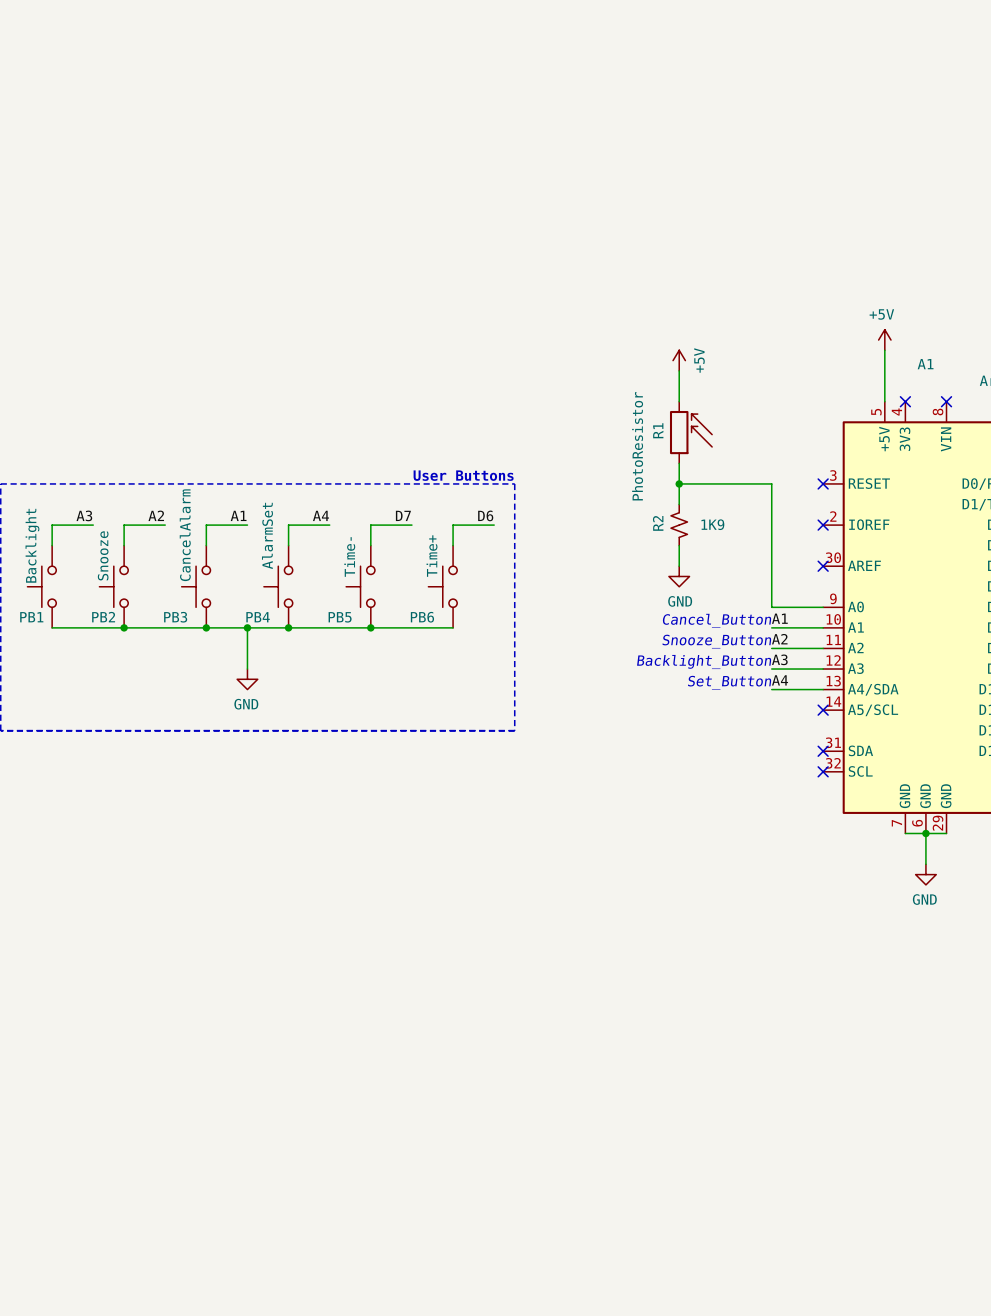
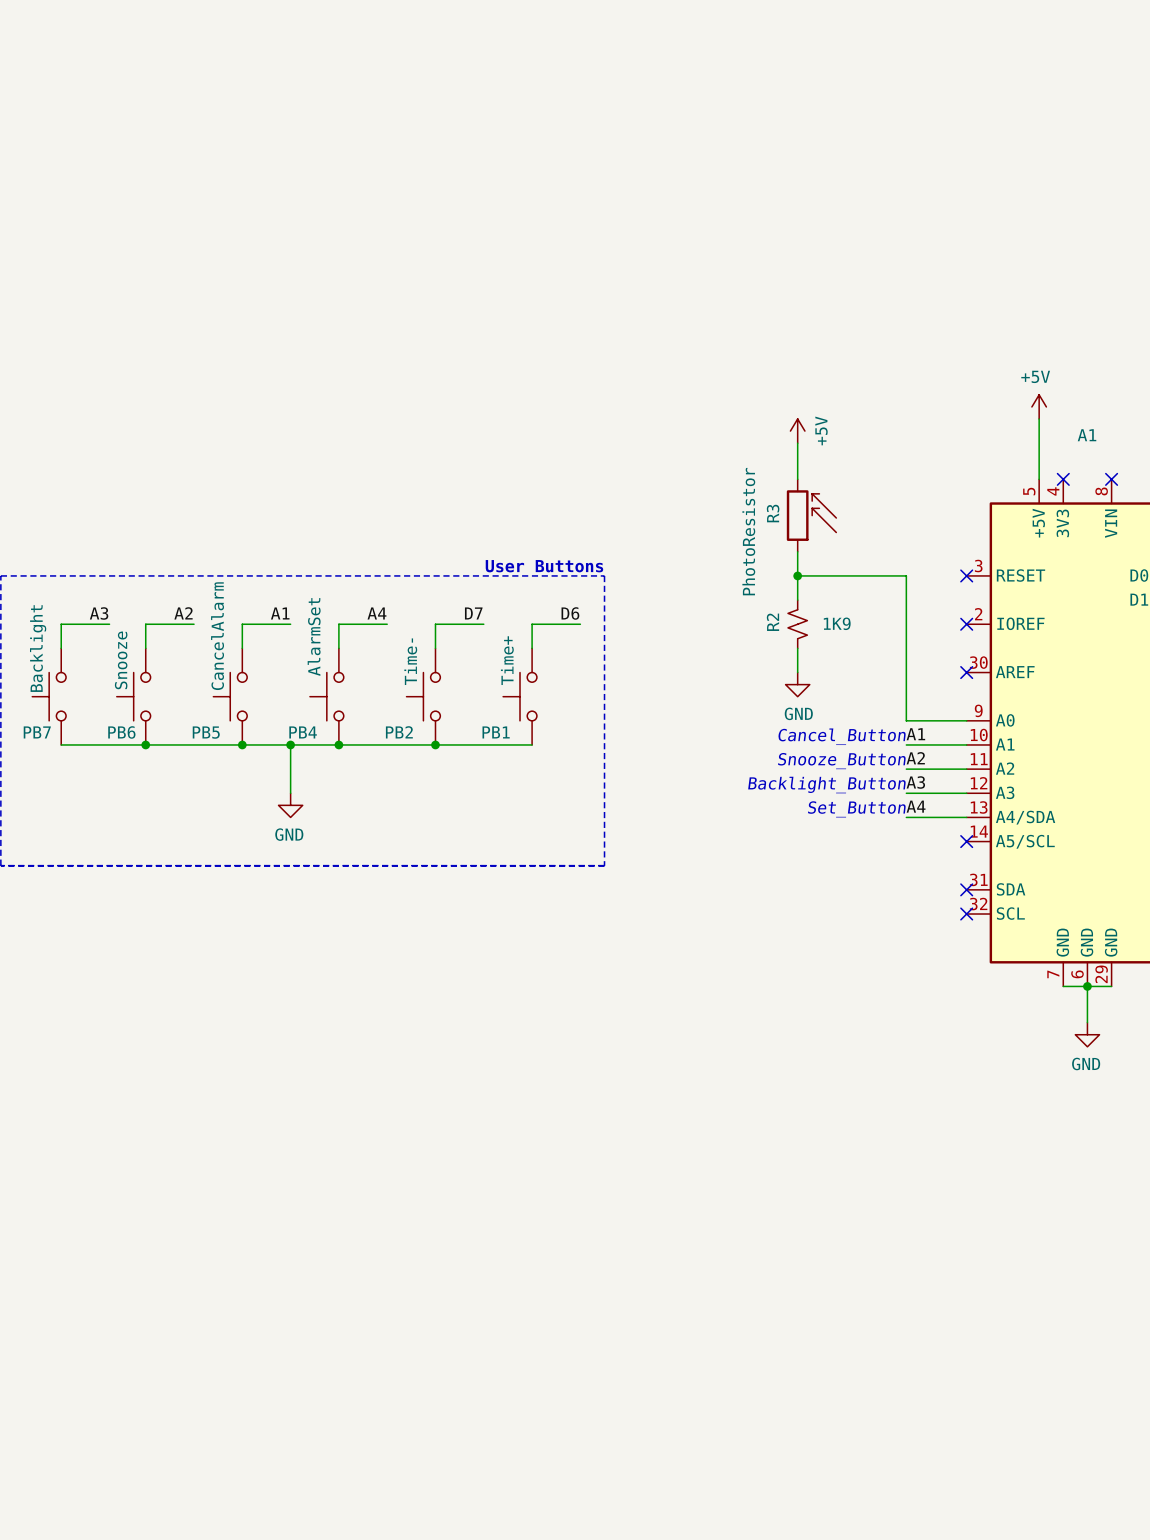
R1 name: R1 (658, 430) -> R3 (773, 513)
PB1 name: PB1 (31, 617) -> PB7 (37, 732)
PB2 name: PB2 (103, 617) -> PB6 (121, 732)
PB3 name: PB3 (175, 617) -> PB5 (206, 732)
PB5 name: PB5 (340, 617) -> PB2 (399, 732)
PB6 name: PB6 (422, 617) -> PB1 (496, 732)

